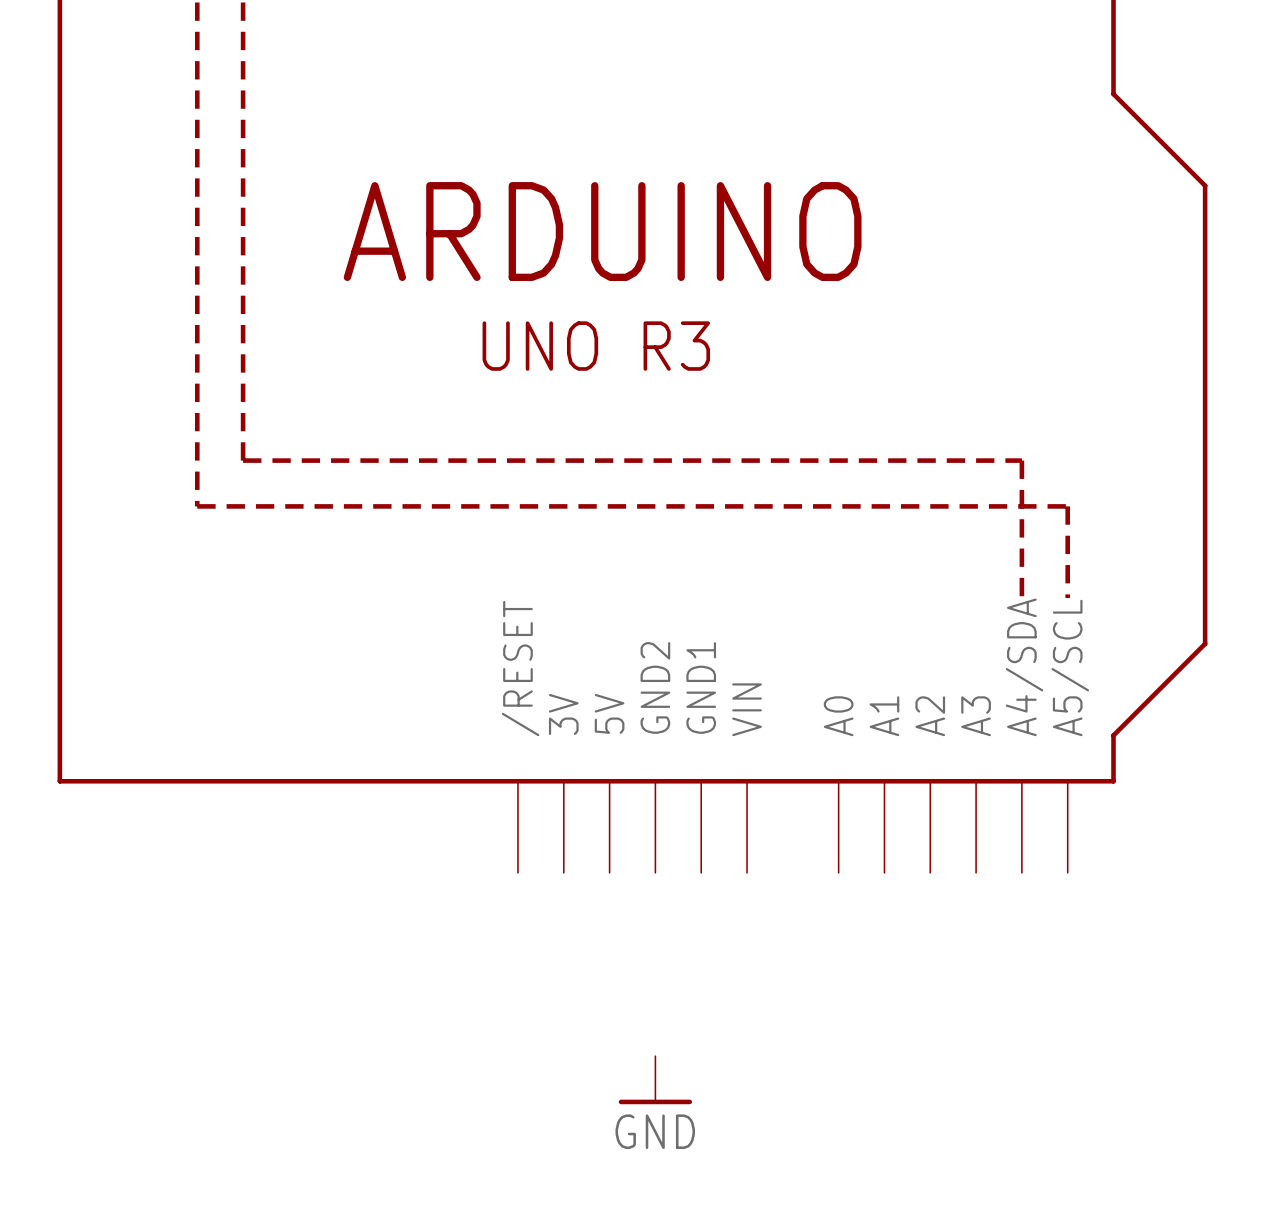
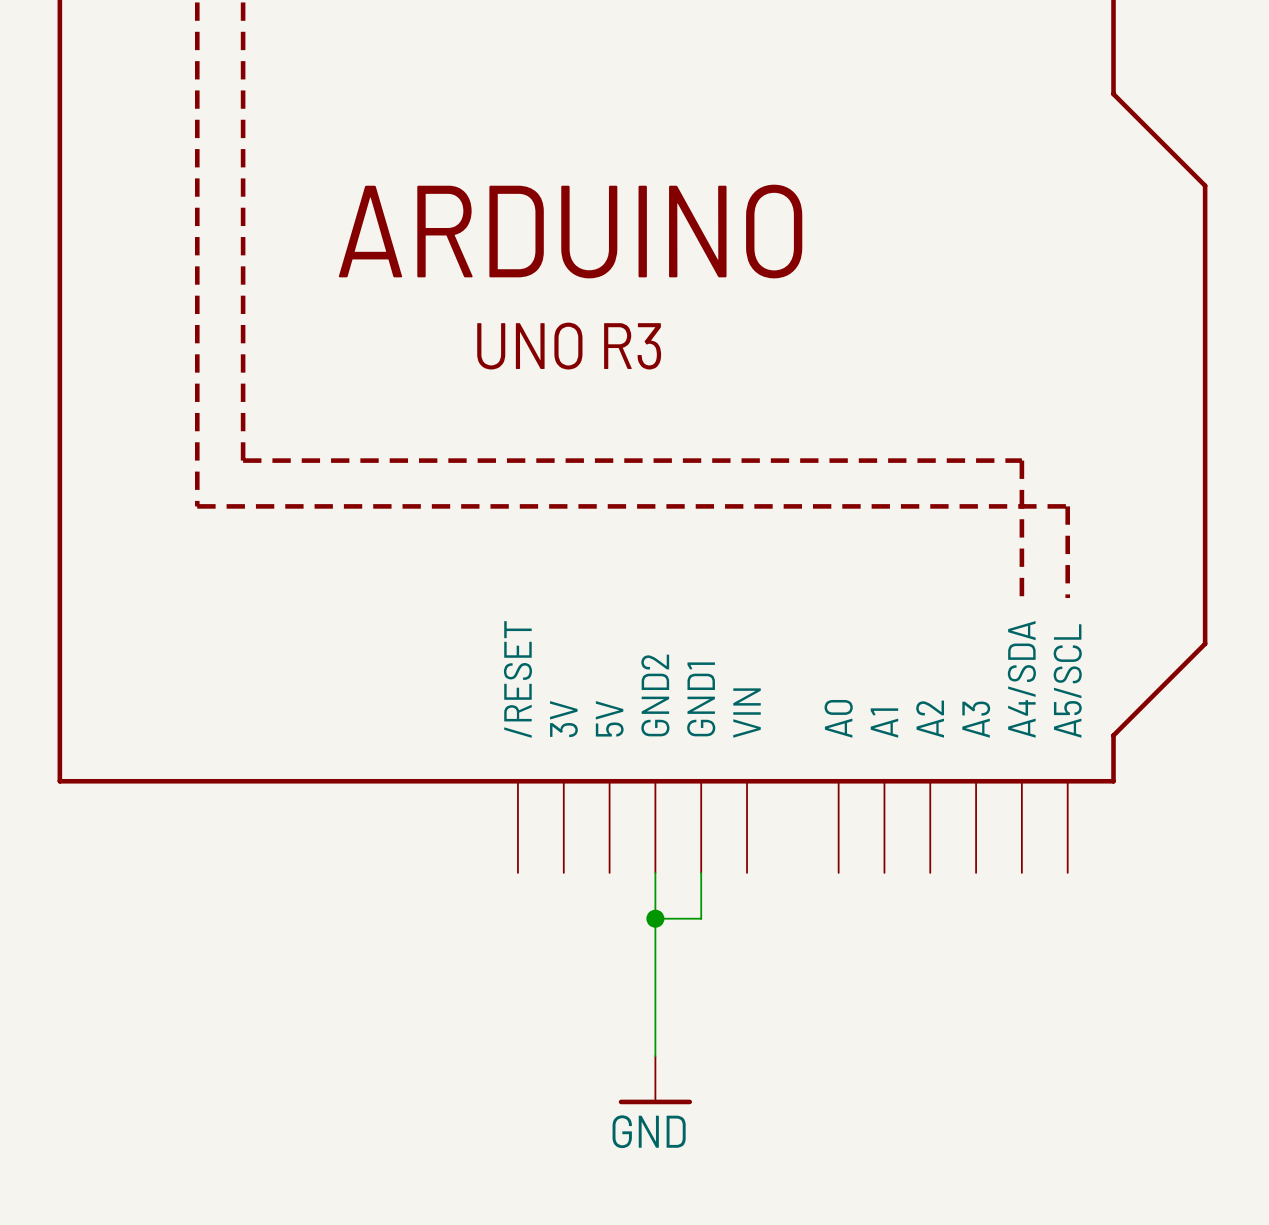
wire: none -> (655, 872) (655, 1056)
wire: none -> (701, 872) (701, 918) (655, 918)
junction: none -> (655, 918)

